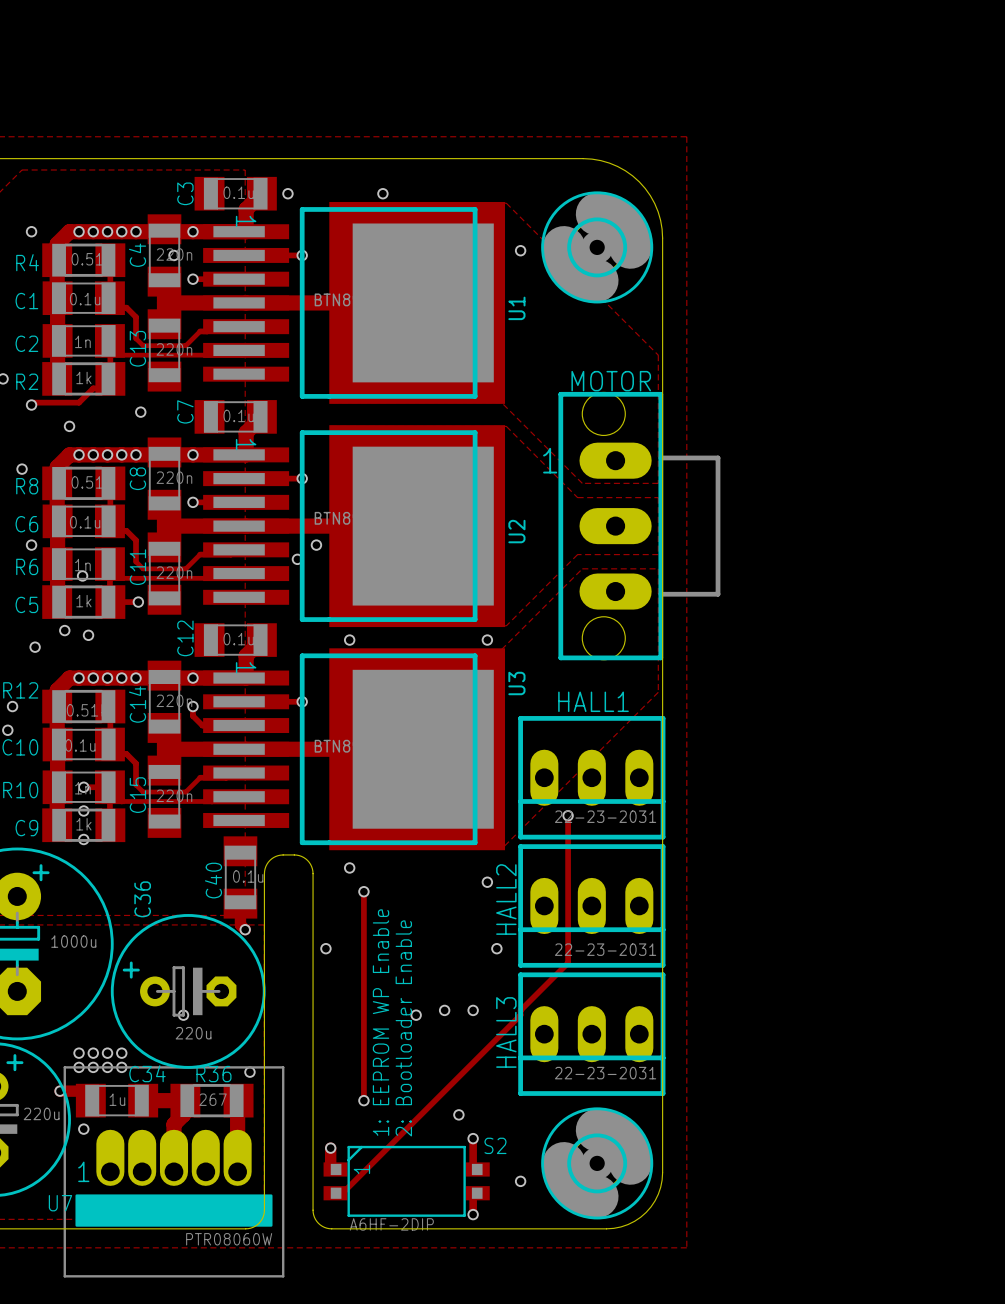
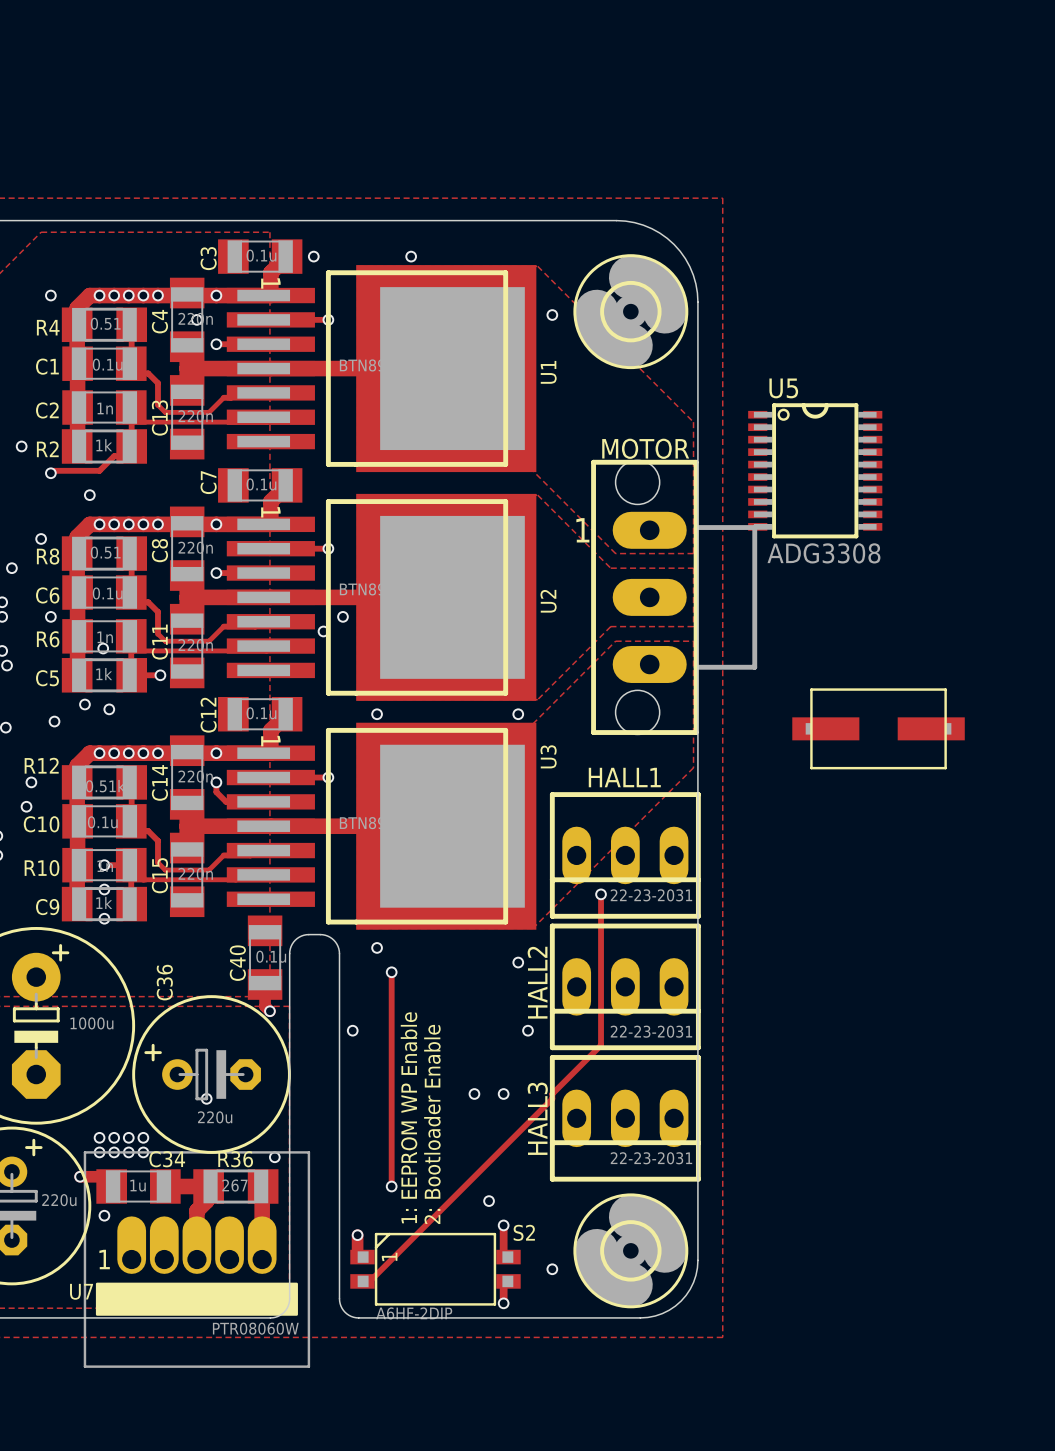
U5: none -> ADG3308 (815, 470)
via: (140, 412) -> none
part: none -> (878, 728)
via: (416, 1015) -> none

